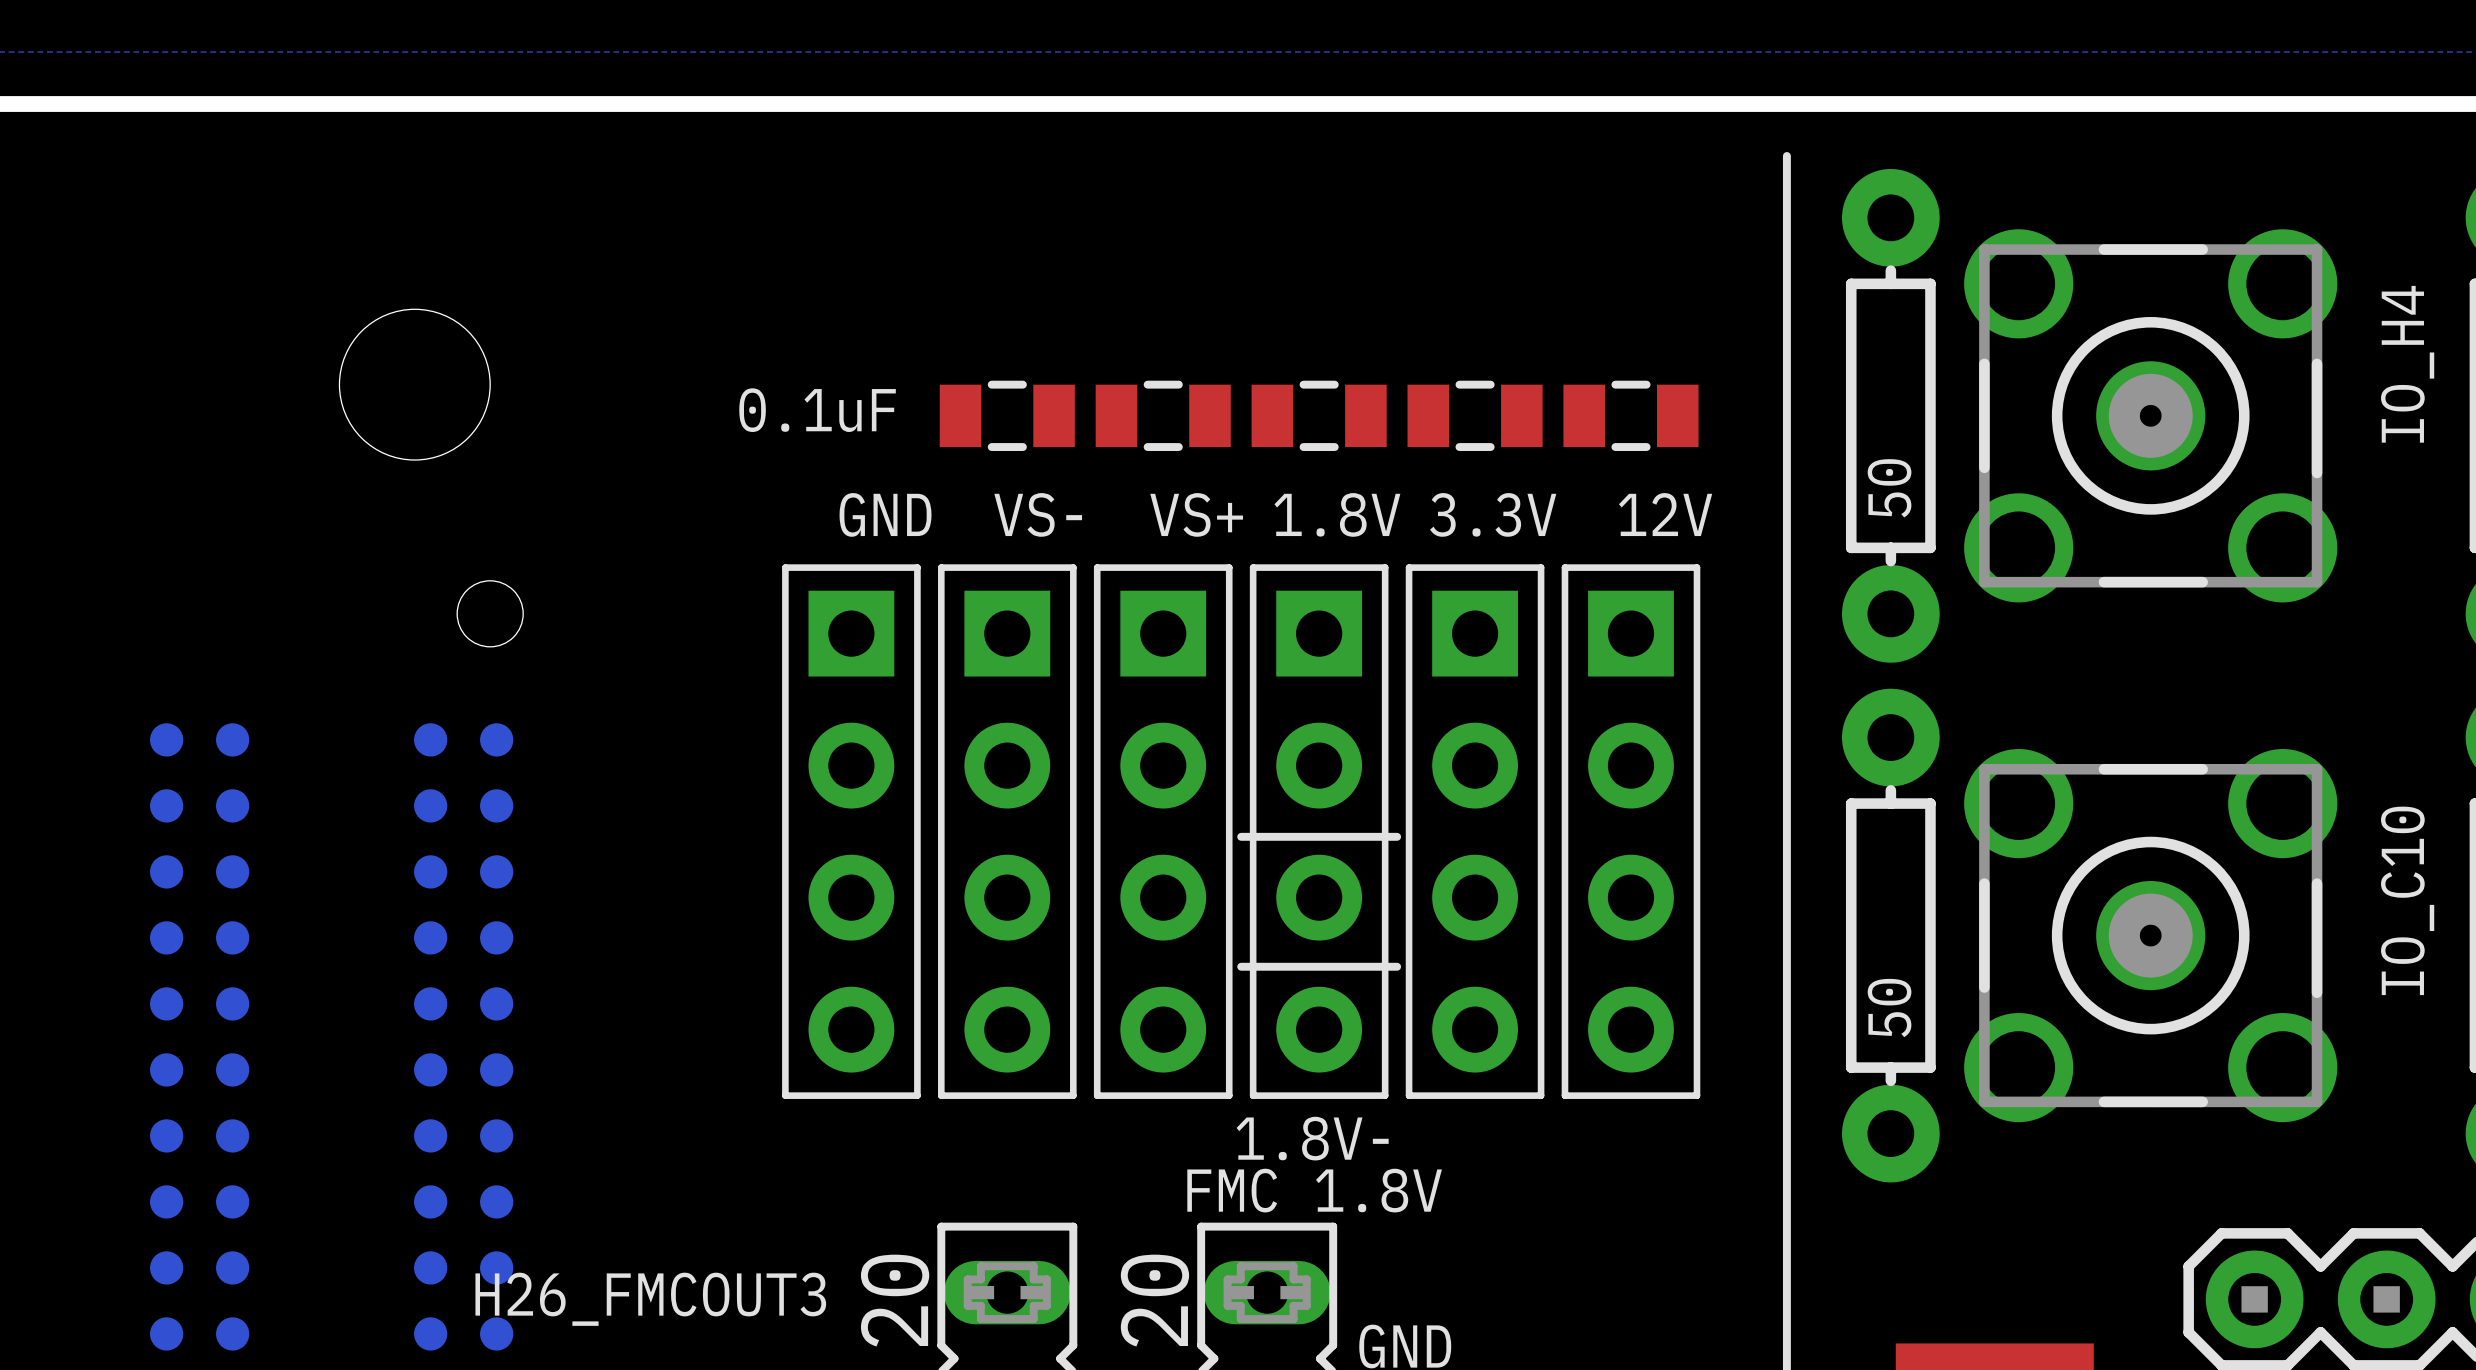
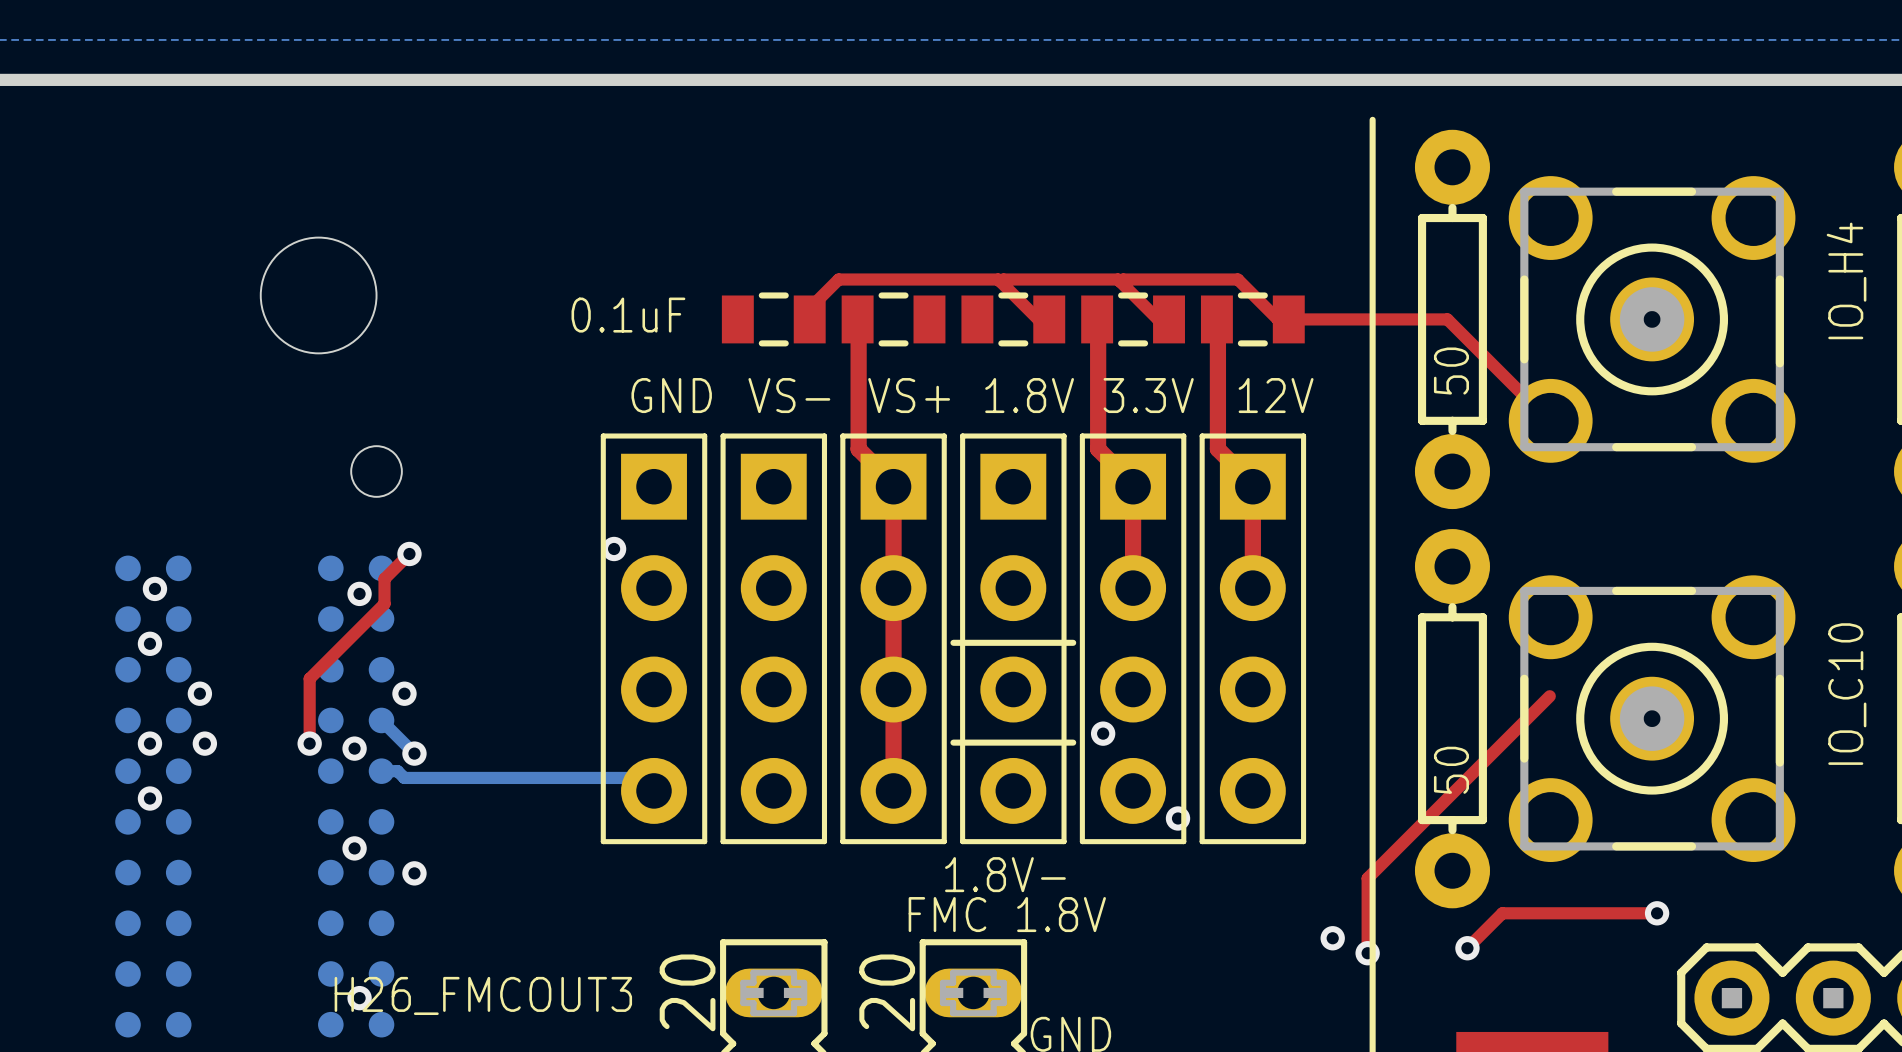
top track: none -> (1000, 282) (1003, 279) (1118, 279) (1158, 319) (1169, 319)
top track: none -> (1120, 282) (1123, 279) (1237, 279) (1277, 319) (1447, 319) (1550, 420)
top track: none -> (809, 319) (813, 319) (813, 304) (838, 279) (998, 279) (1038, 319) (1049, 319)
top track: none -> (857, 319) (858, 449) (893, 484) (893, 790)
top track: none -> (1097, 319) (1098, 449) (1133, 484) (1133, 588)
top track: none -> (1216, 319) (1217, 449) (1252, 484) (1252, 588)
via: none -> (614, 548)
top track: none -> (409, 553) (384, 578) (384, 603) (309, 678) (309, 743)
via: none -> (409, 553)
via: none -> (154, 588)
via: none -> (359, 593)
via: none -> (149, 643)
via: none -> (199, 693)
via: none -> (404, 693)
top track: none -> (1549, 696) (1367, 878) (1367, 953)
bottom track: none -> (381, 720) (414, 753)
via: none -> (1103, 733)
via: none -> (149, 743)
via: none -> (204, 743)
via: none -> (309, 743)
via: none -> (354, 748)
via: none -> (414, 753)
bottom track: none -> (381, 771) (397, 771) (404, 777) (641, 777) (654, 790)
via: none -> (149, 798)
via: none -> (1178, 818)
via: none -> (354, 848)
via: none -> (414, 873)
top track: none -> (1657, 913) (1502, 913) (1467, 948)
via: none -> (1657, 913)
via: none -> (1332, 938)
via: none -> (1467, 948)
via: none -> (1367, 953)
via: none -> (359, 998)

